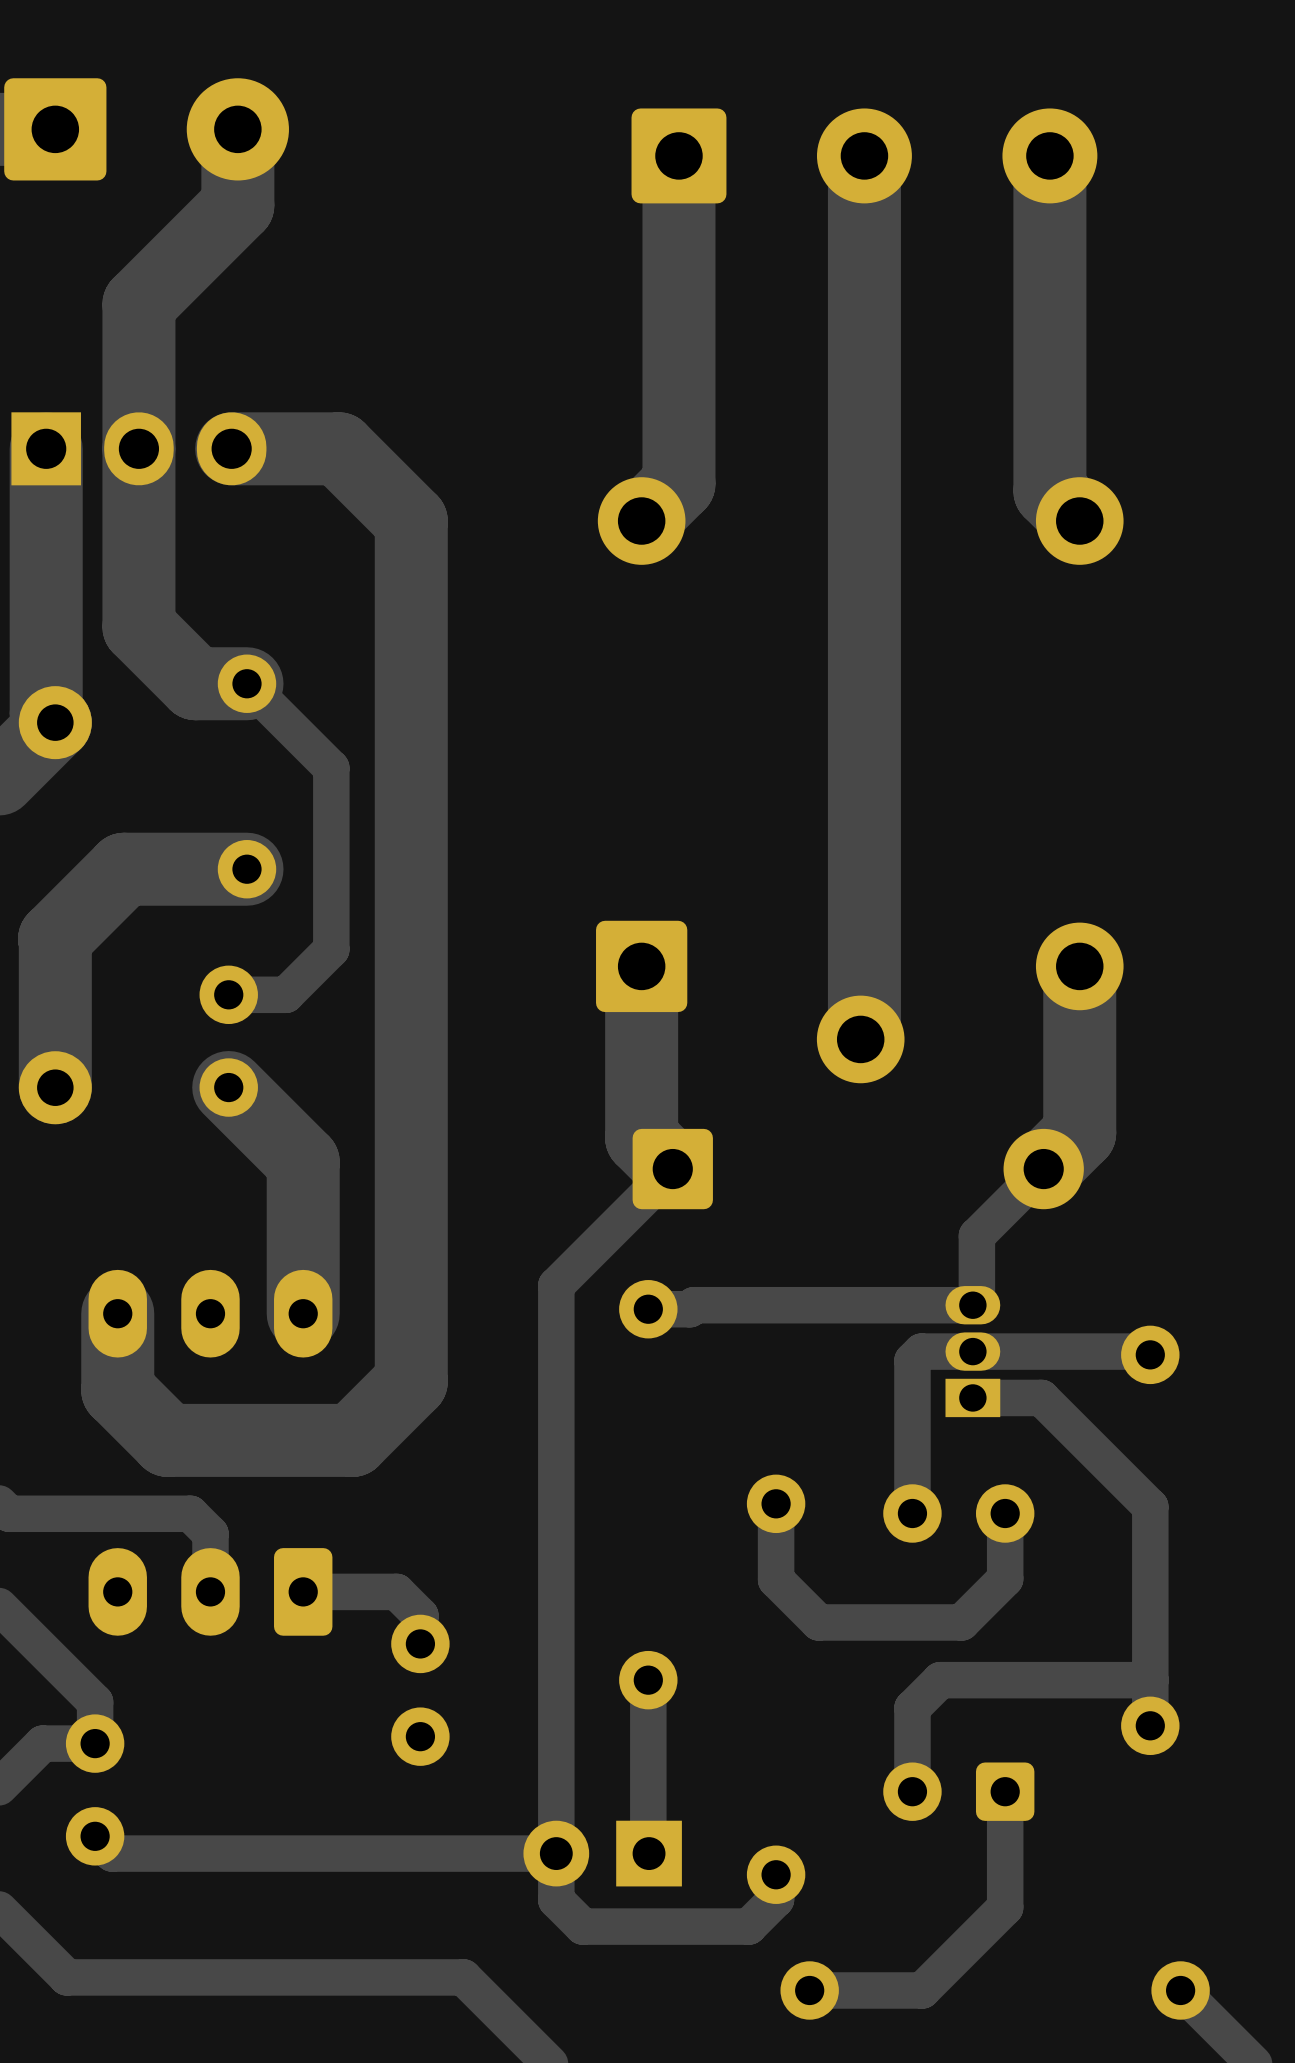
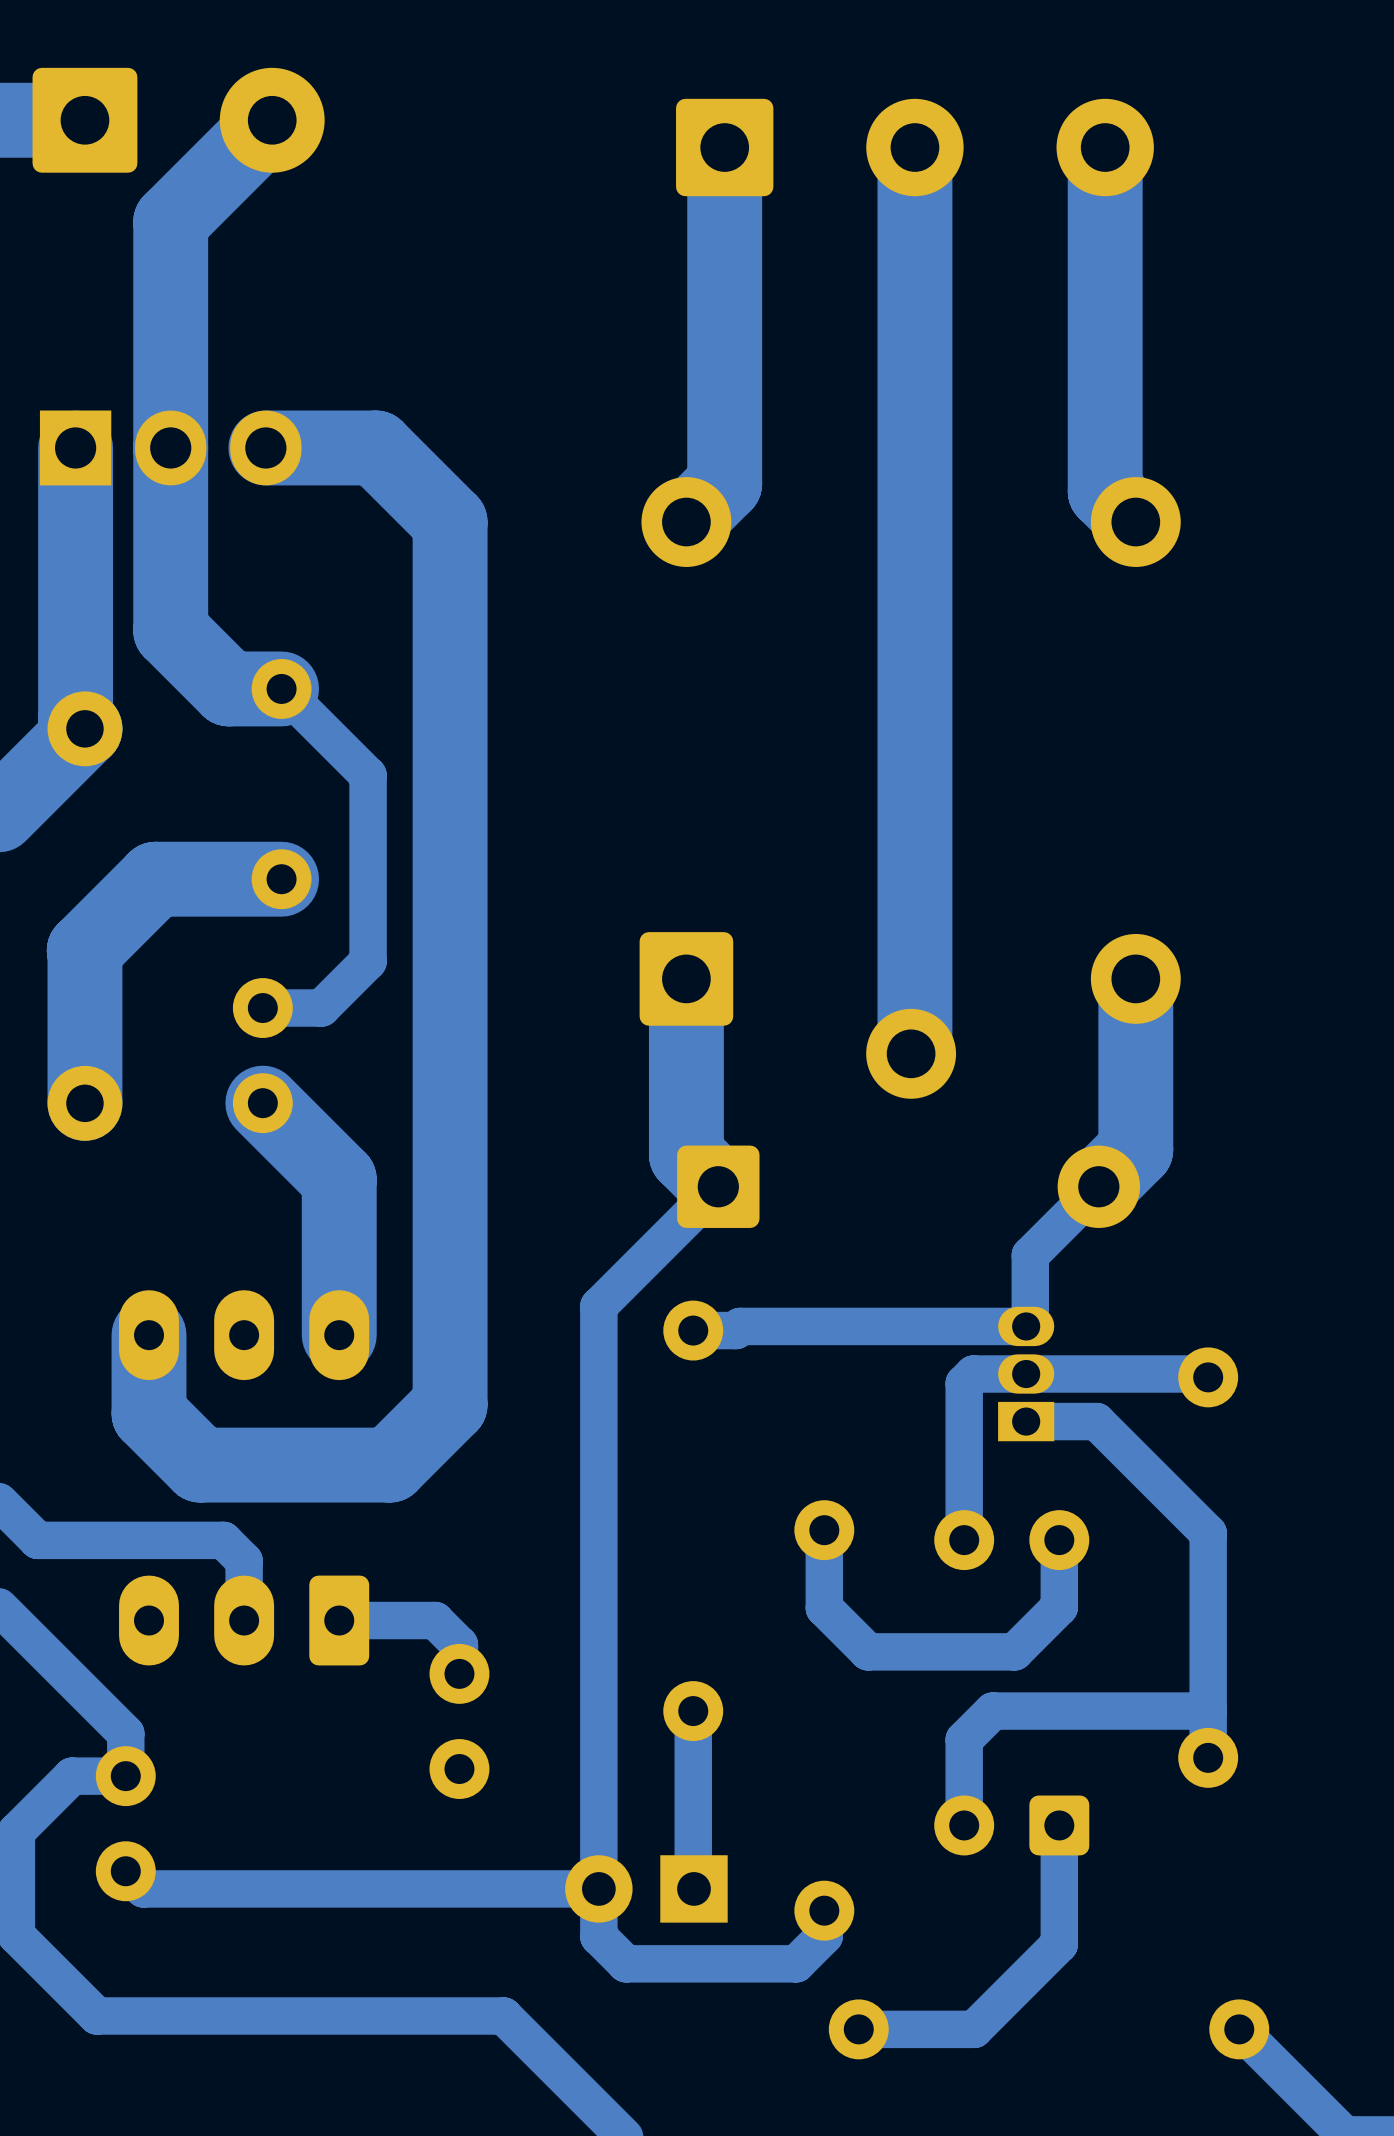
track: (237, 129) (237, 205) (138, 304) -> (272, 120) (170, 221) (170, 299)

